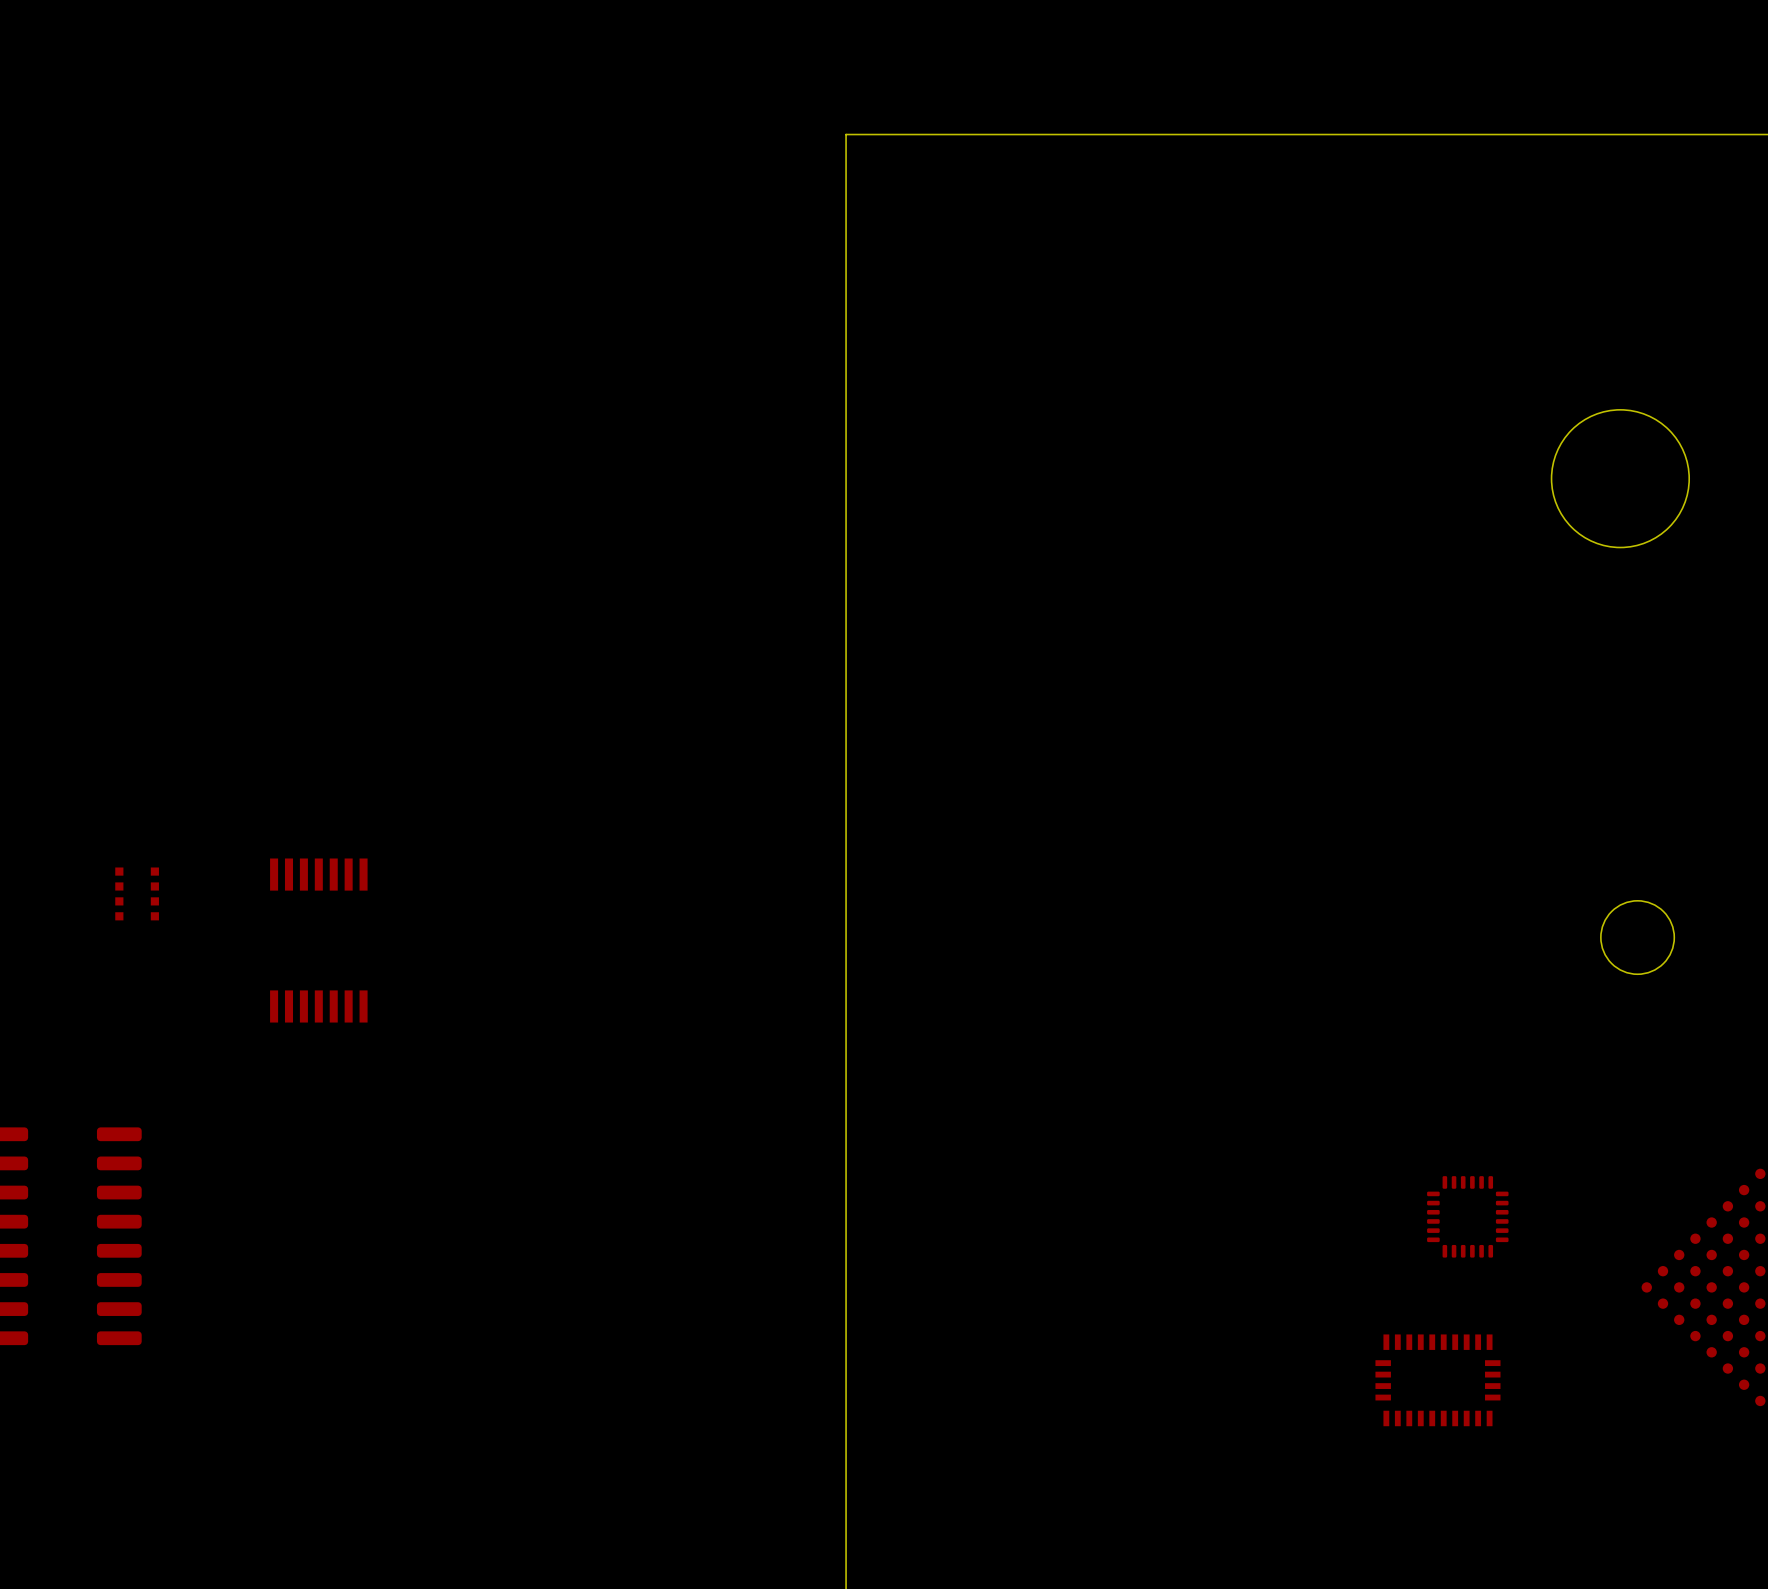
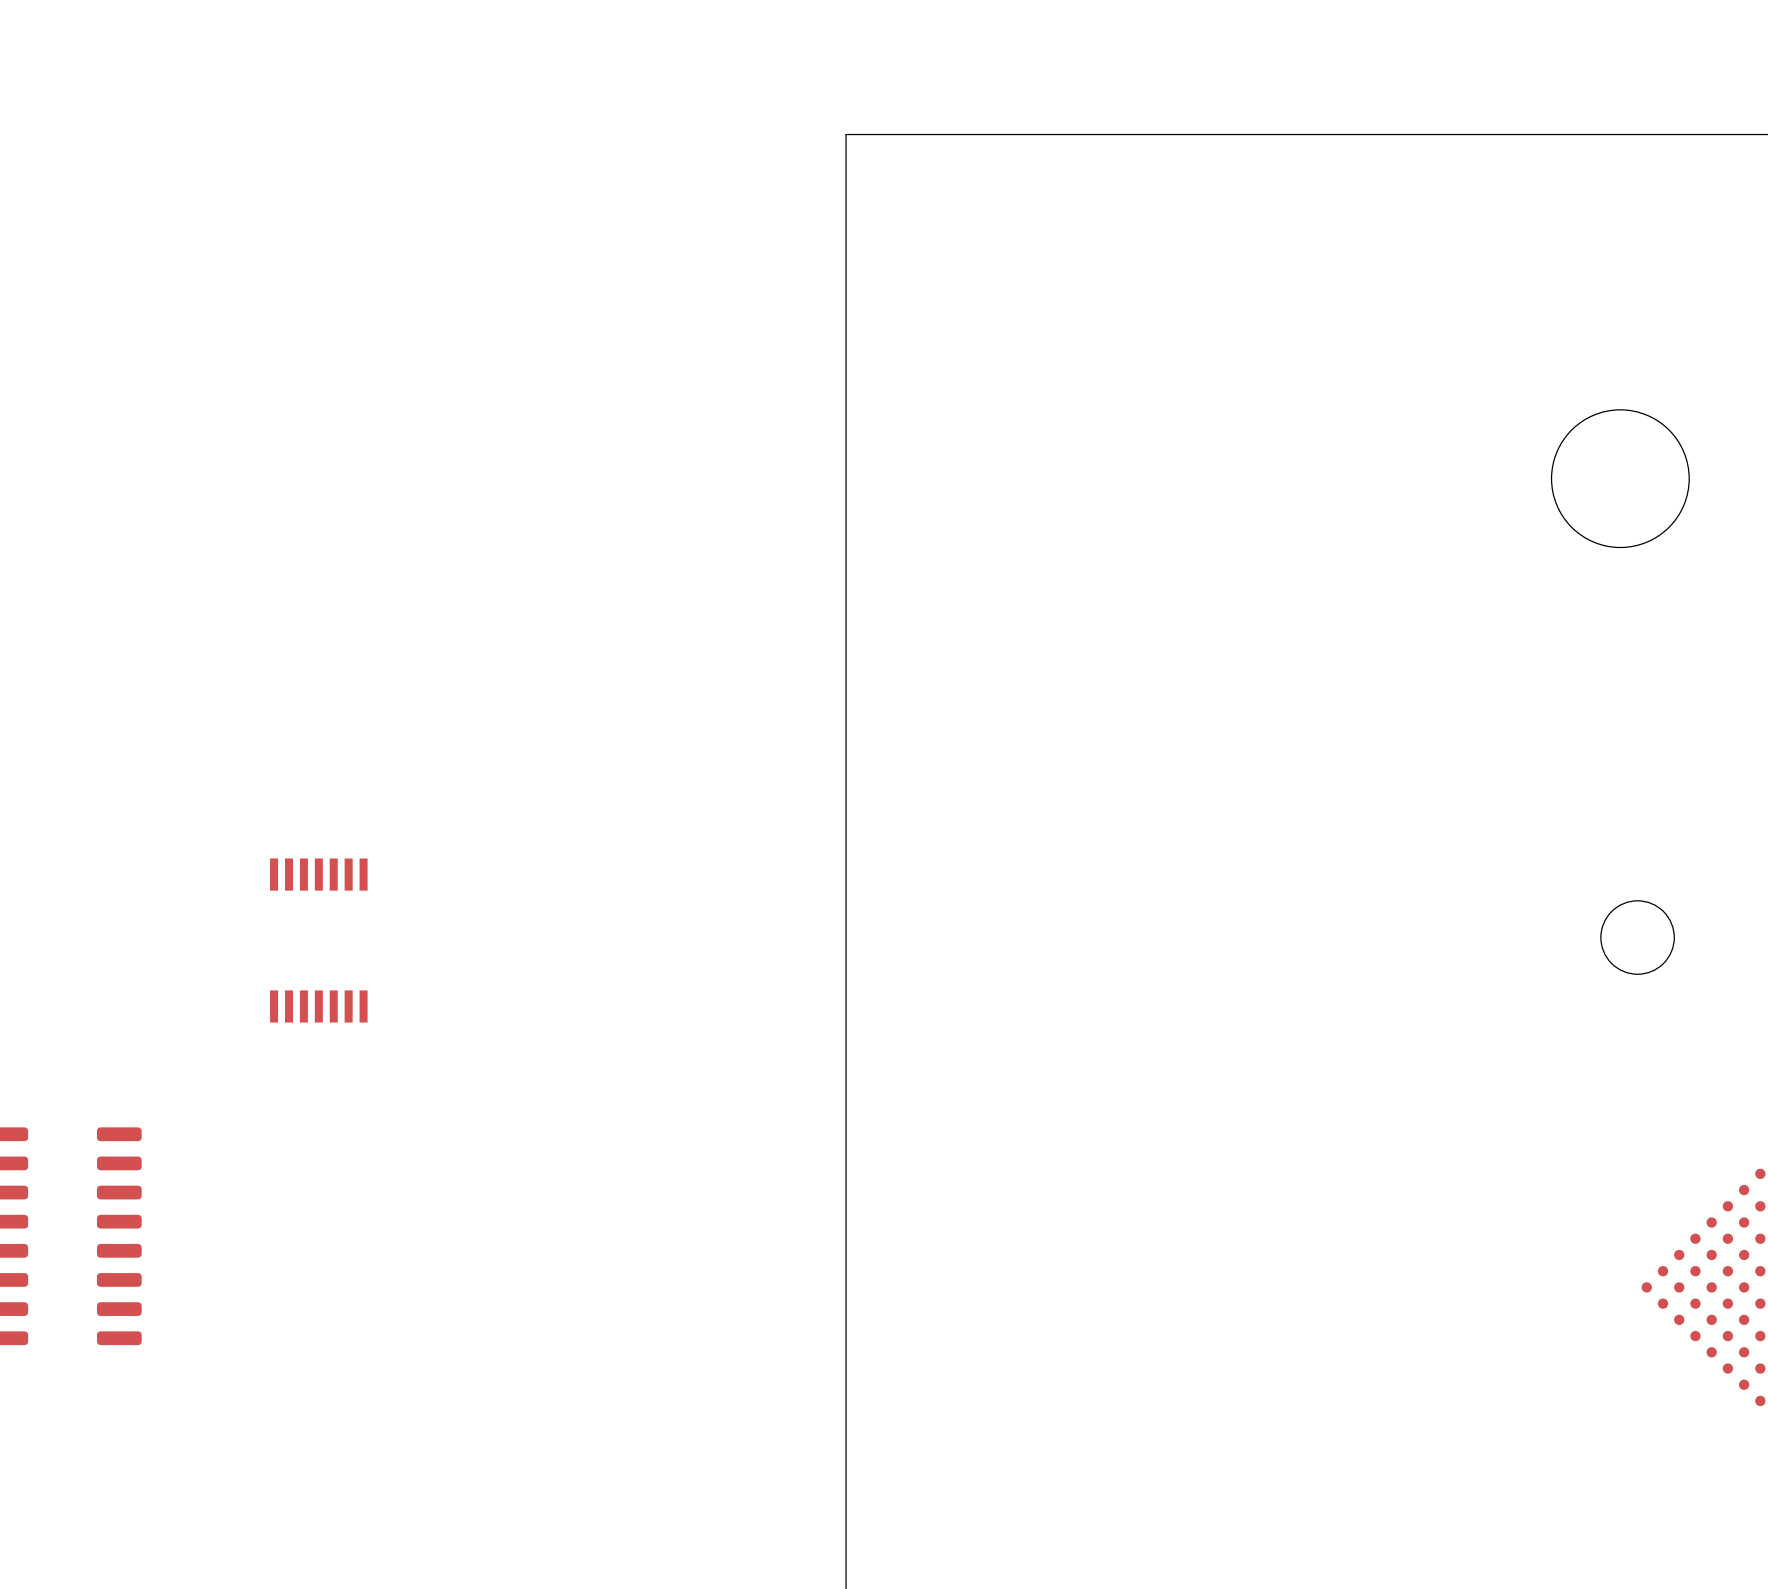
part: (137, 893) -> none
part: (1467, 1216) -> none
part: (1437, 1380) -> none

